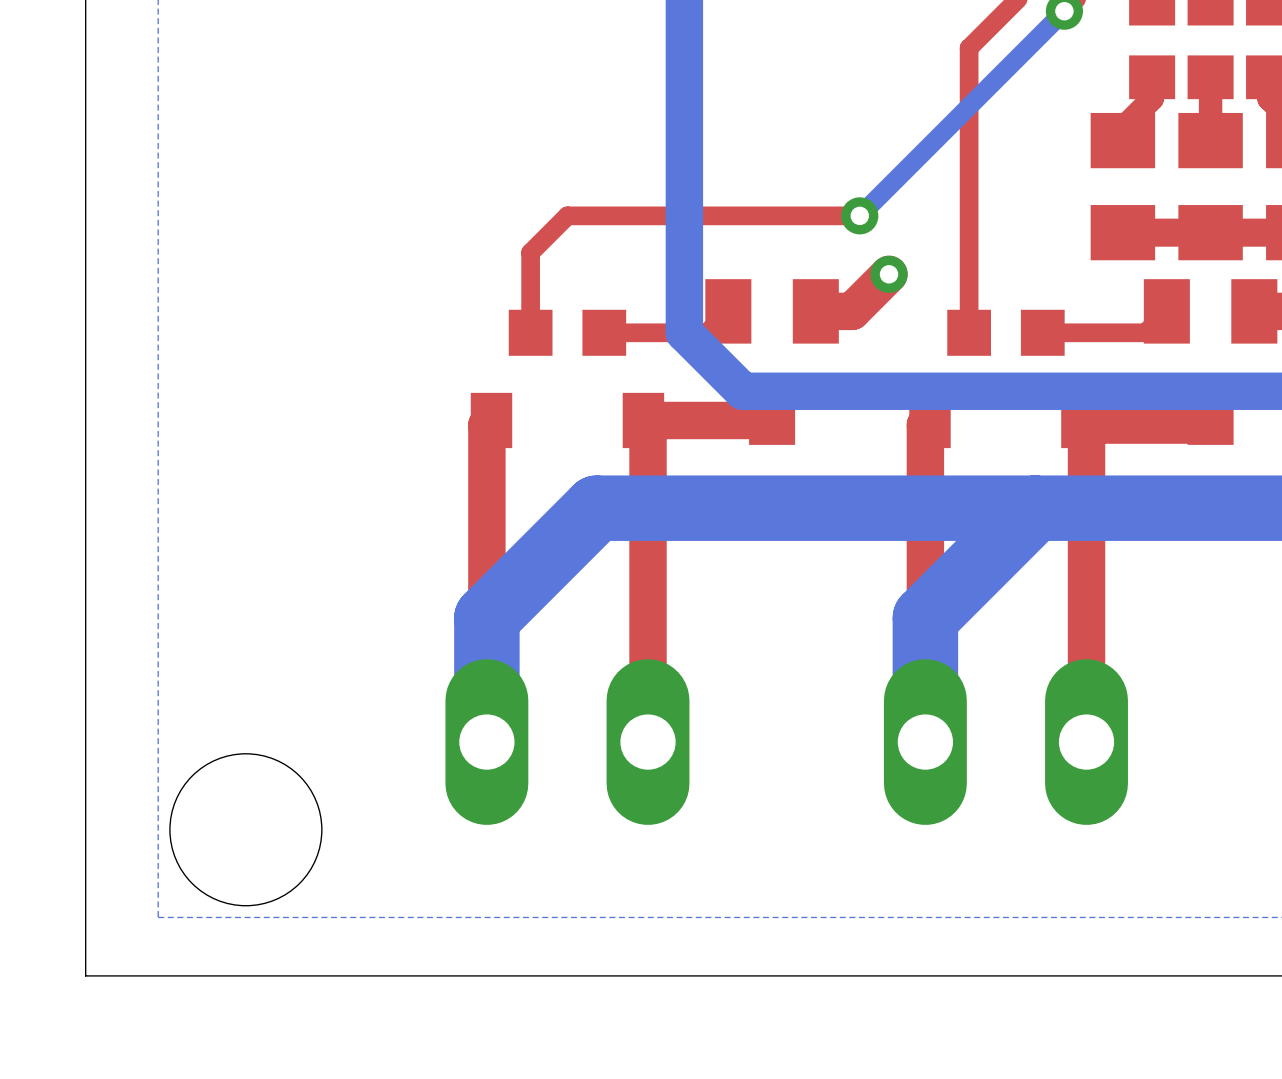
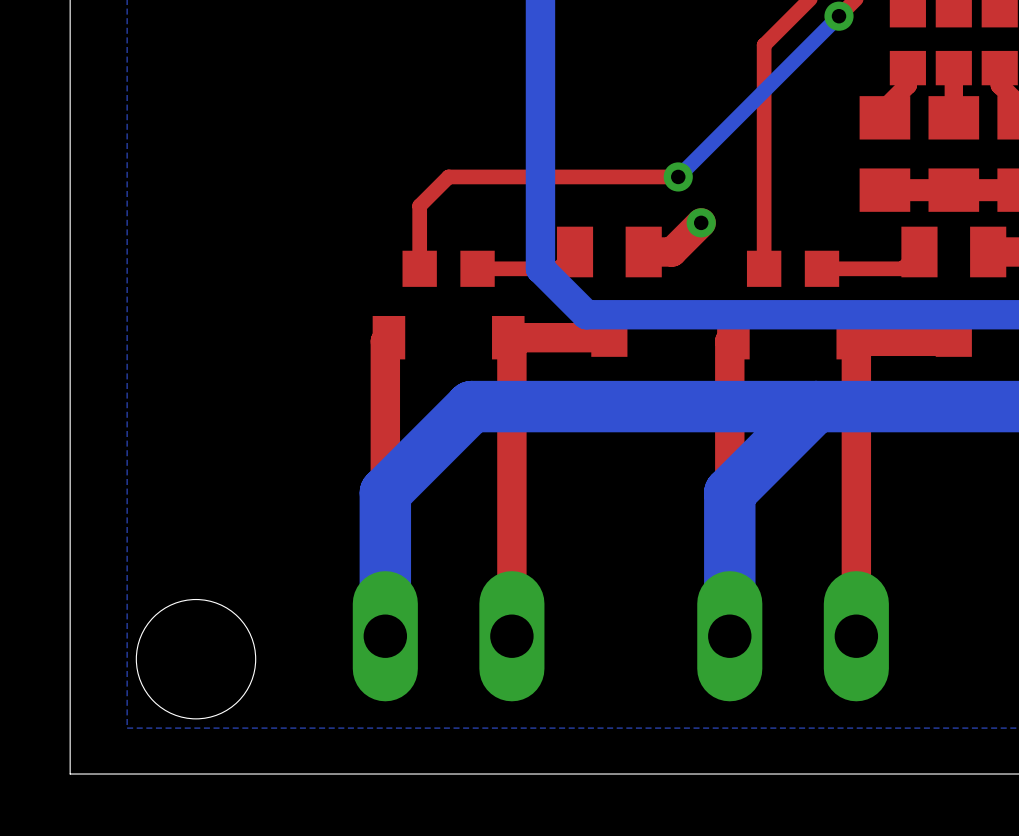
part position: (567, 742) -> (448, 636)
part position: (1005, 742) -> (793, 636)

